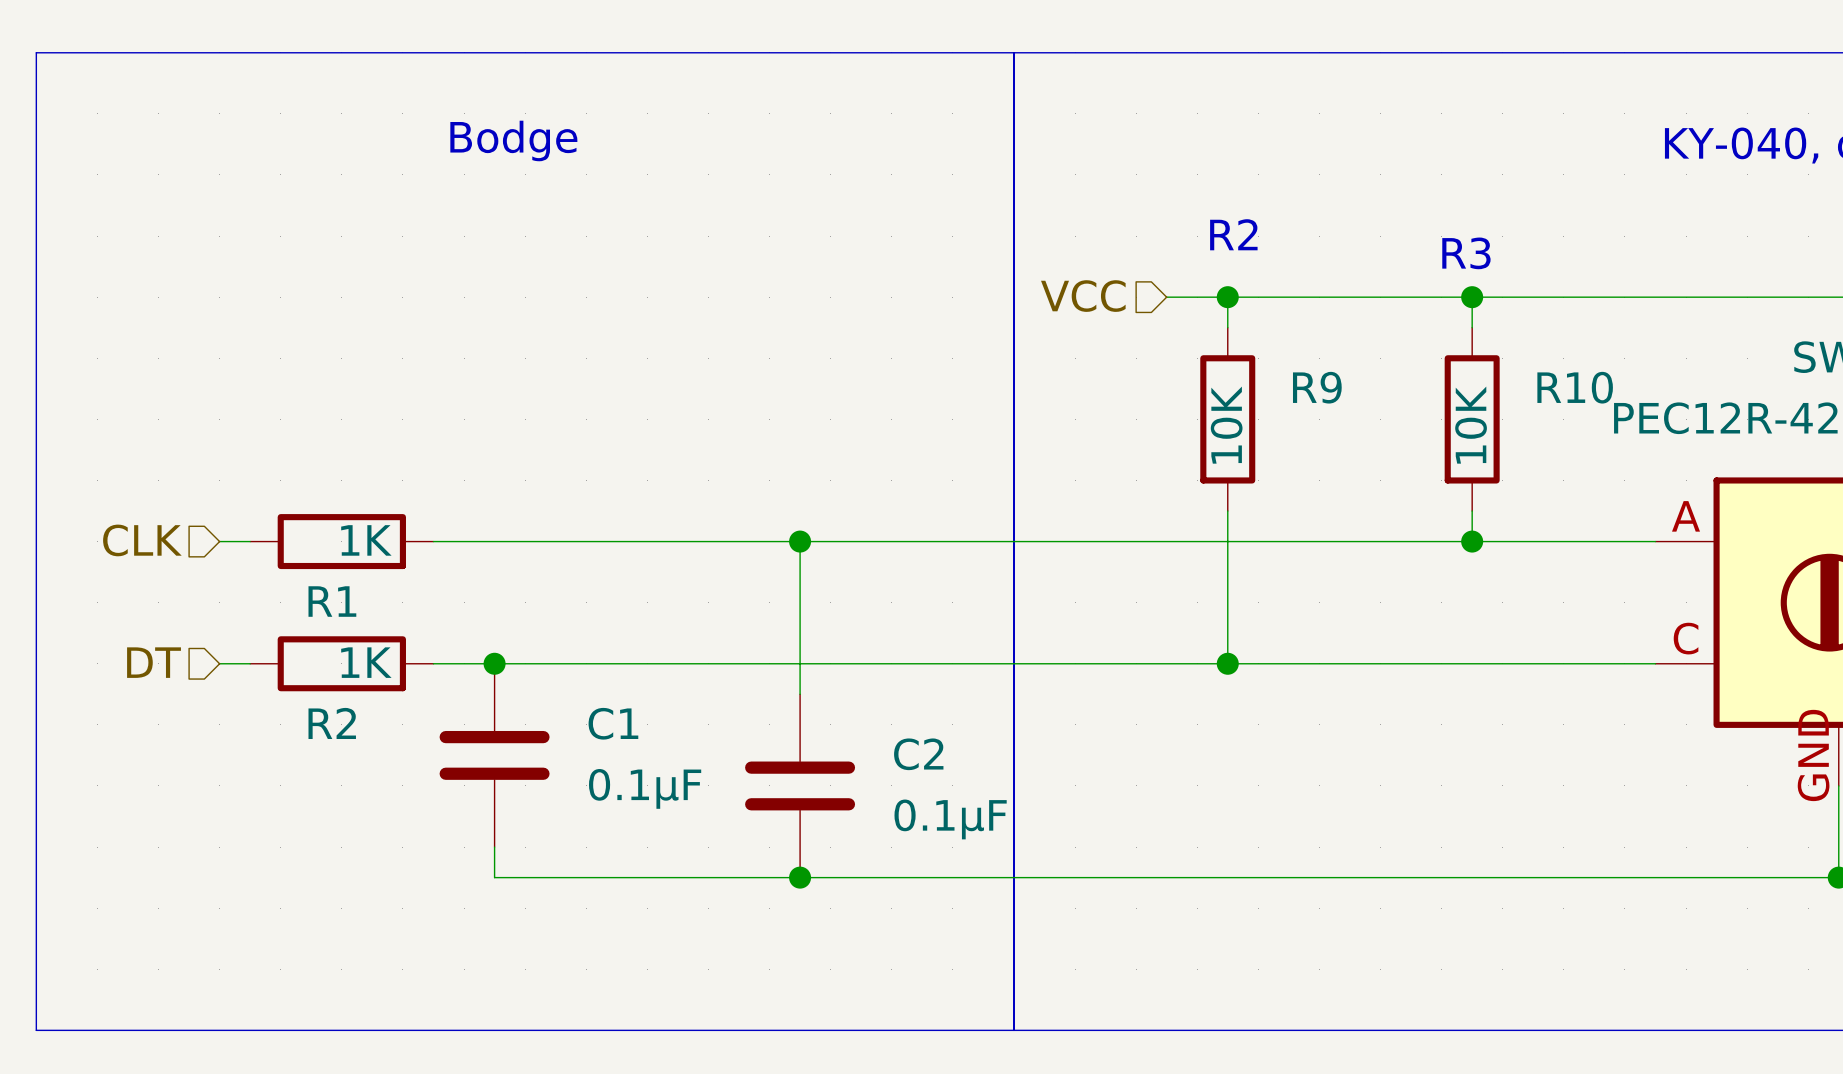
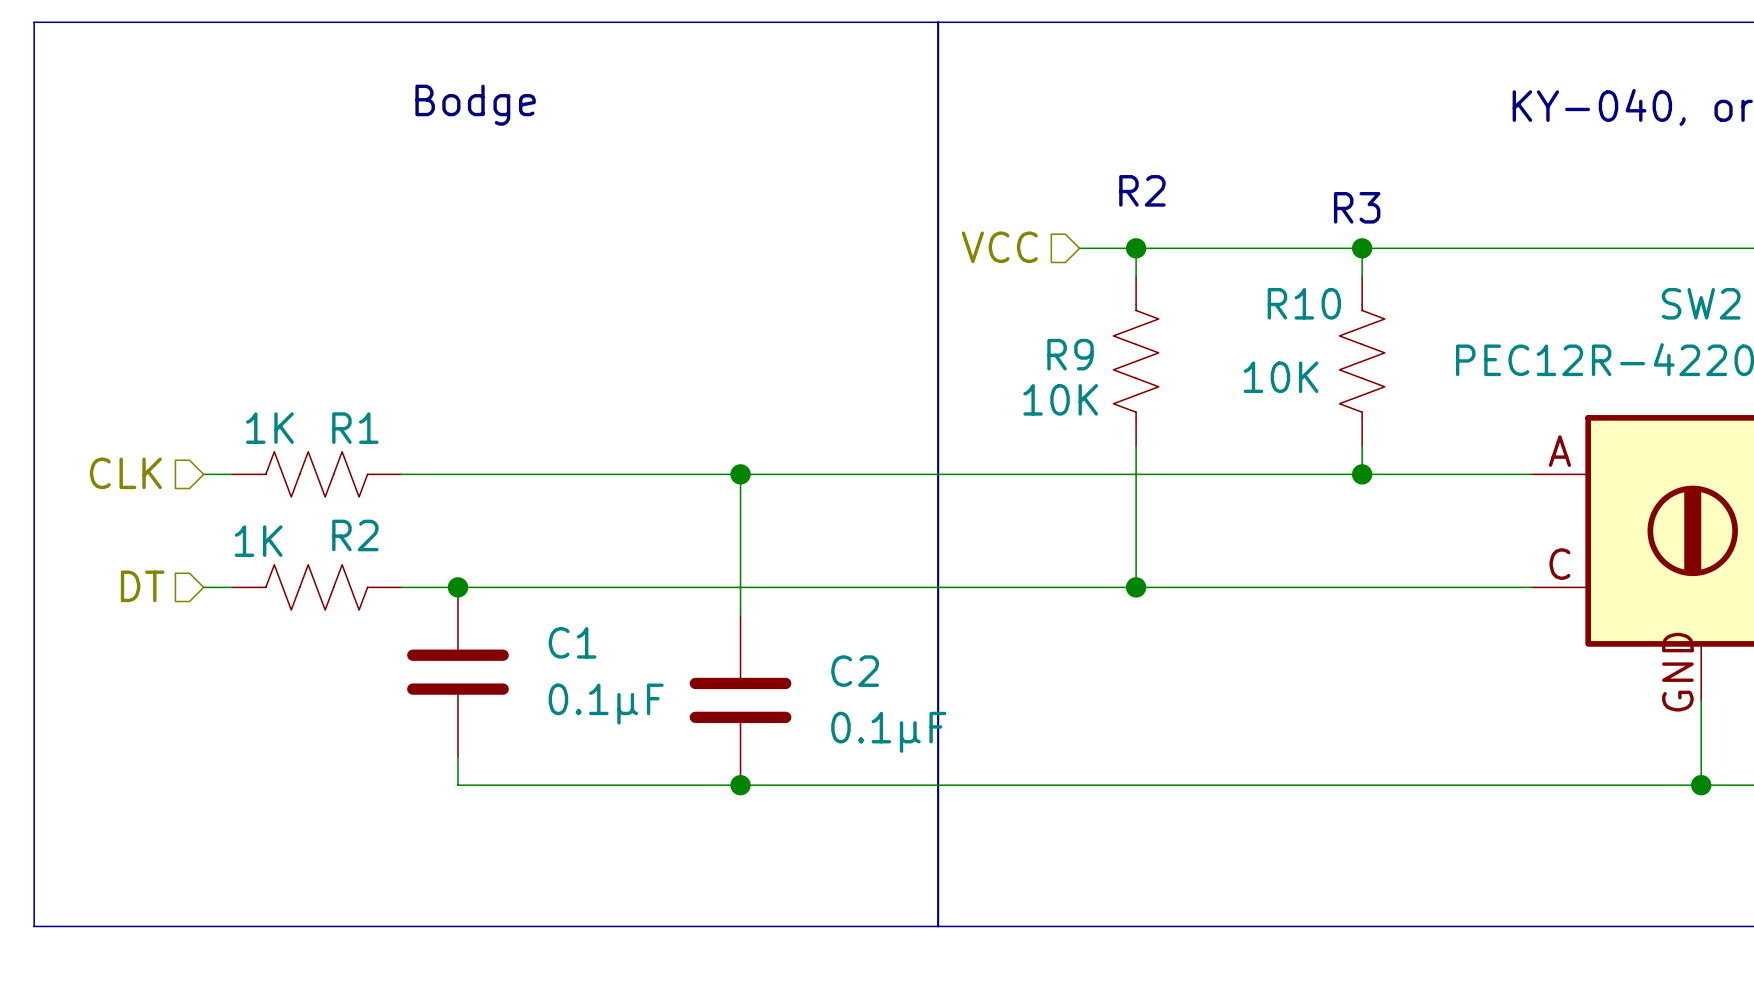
R9 symbol: [1200, 327, 1256, 512] -> [1113, 276, 1159, 447]
R10 symbol: [1444, 327, 1500, 512] -> [1339, 276, 1385, 447]
R9 name position: R9 (1317, 387) -> R9 (1070, 354)
R10 name position: R10 (1575, 387) -> R10 (1304, 303)
R9 value position: 10K (1226, 425) -> 10K (1060, 399)
R10 value position: 10K (1471, 425) -> 10K (1281, 377)
R1 symbol: [250, 514, 434, 570] -> [231, 451, 402, 497]
R1 value position: 1K (366, 540) -> 1K (269, 428)
R1 name position: R1 (332, 601) -> R1 (355, 428)
R2 symbol: [250, 636, 434, 692] -> [231, 564, 402, 611]
R2 value position: 1K (366, 662) -> 1K (258, 541)
R2 name position: R2 (332, 723) -> R2 (355, 535)

